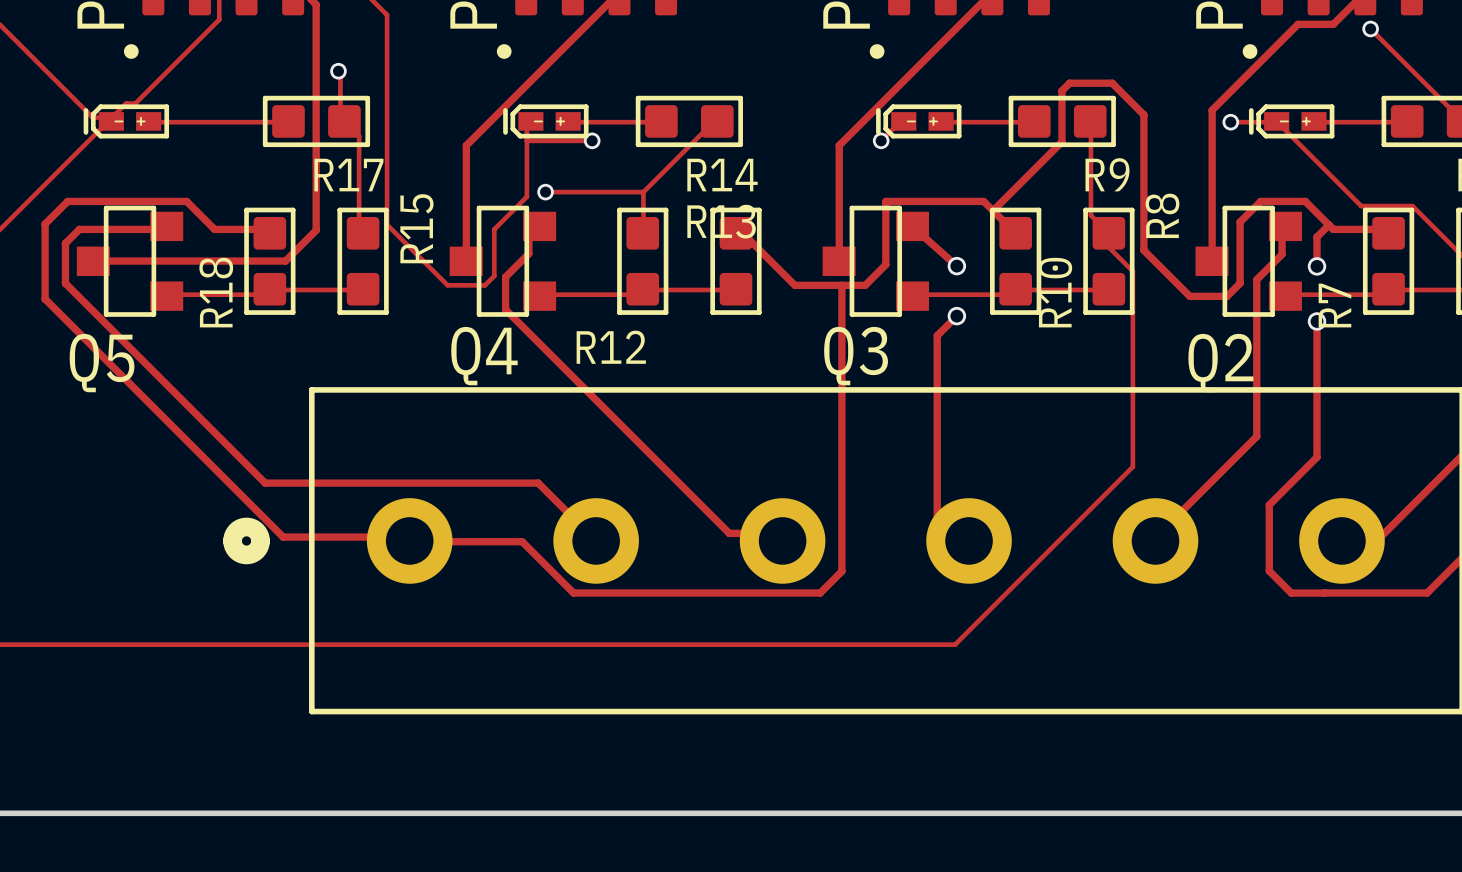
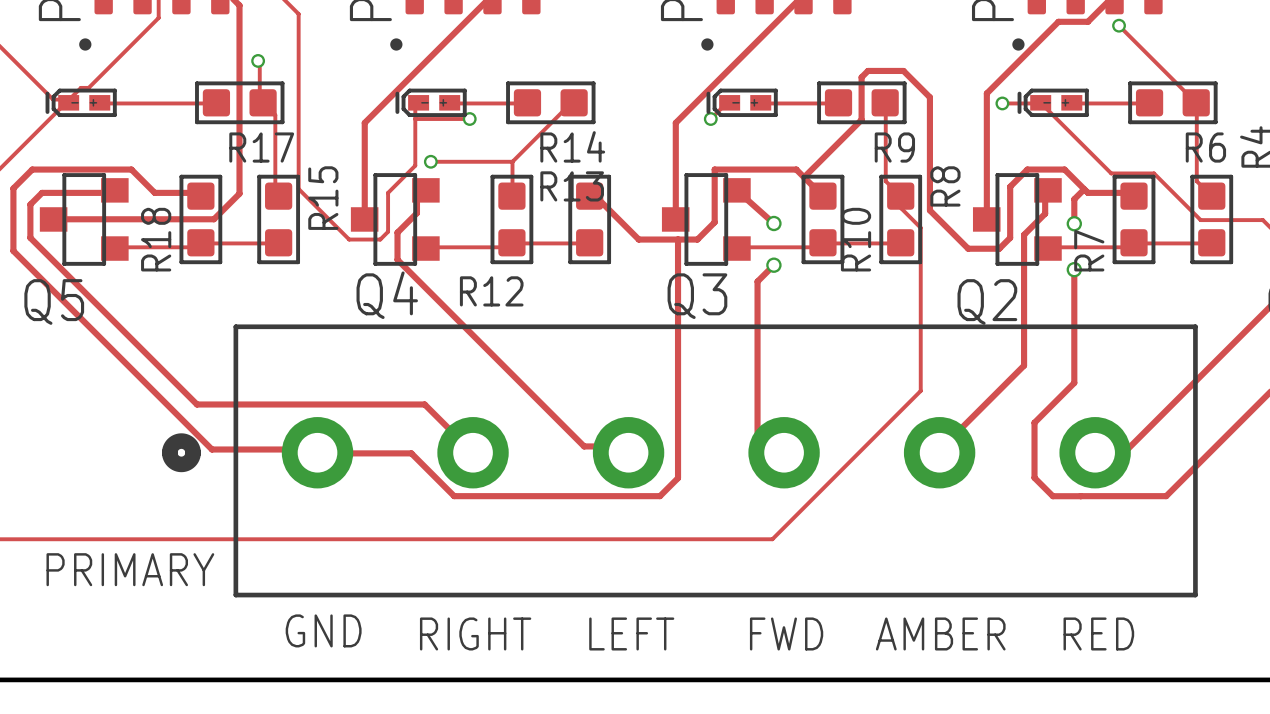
text: none -> PRIMARY (130, 569)
text: none -> GND (323, 630)
text: none -> RIGHT (475, 633)
text: none -> LEFT (631, 633)
text: none -> FWD (786, 633)
text: none -> AMBER (940, 633)
text: none -> RED (1098, 633)

